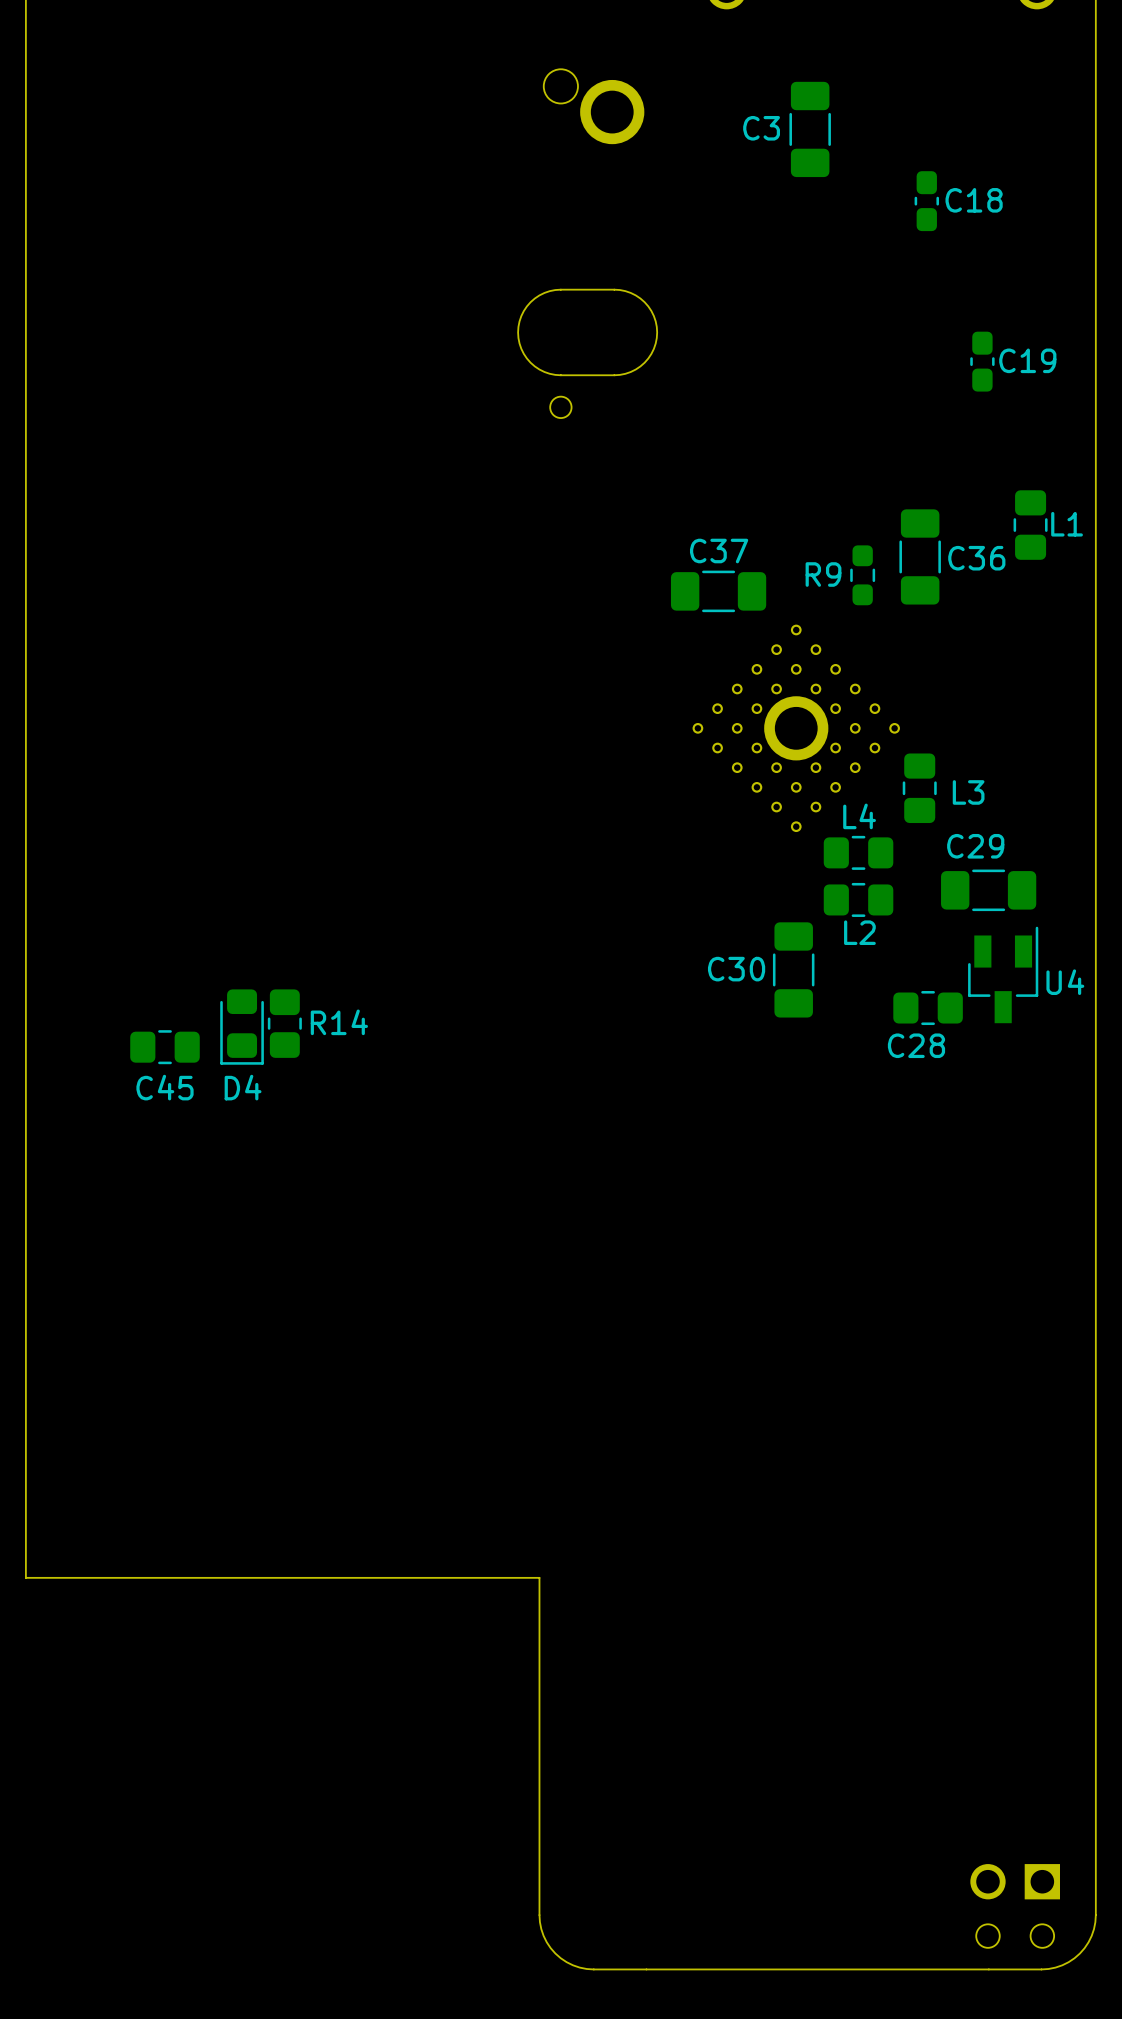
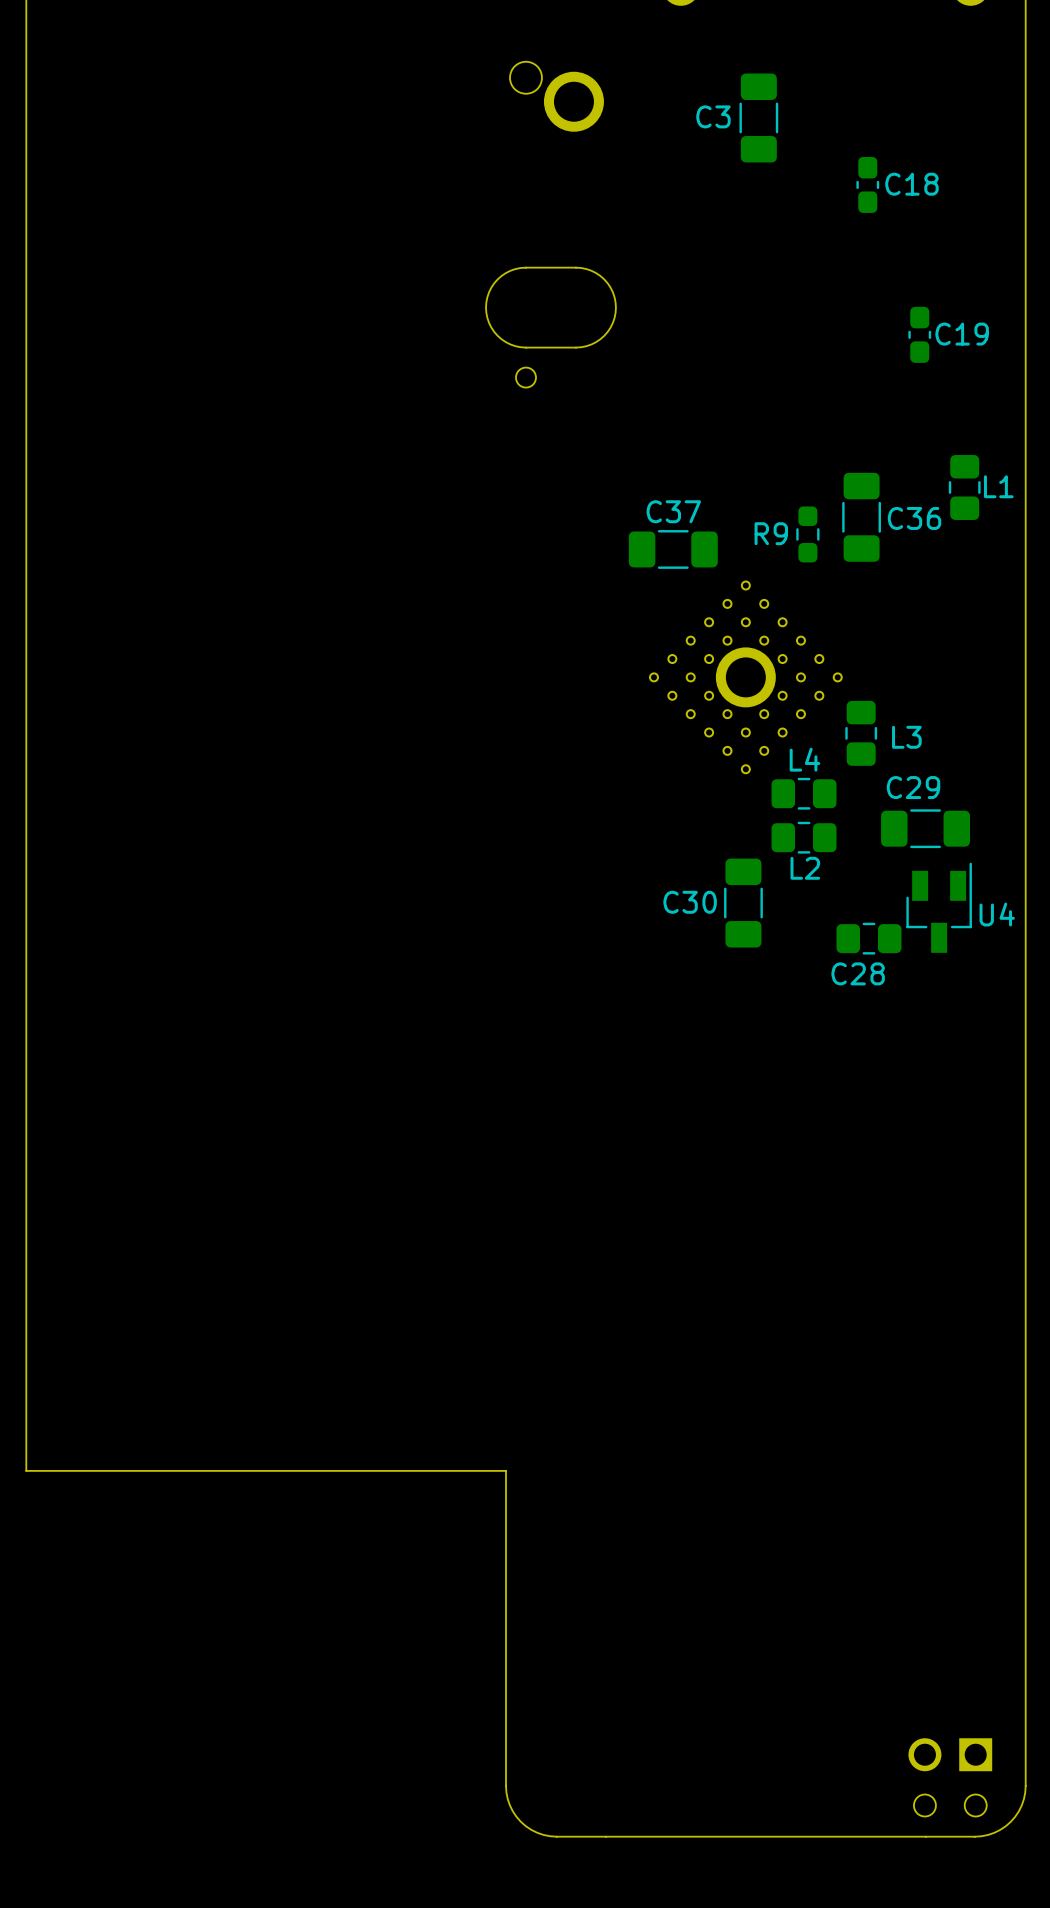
R14: (284, 1023) -> none
D4: (242, 1027) -> none
C45: (165, 1047) -> none

